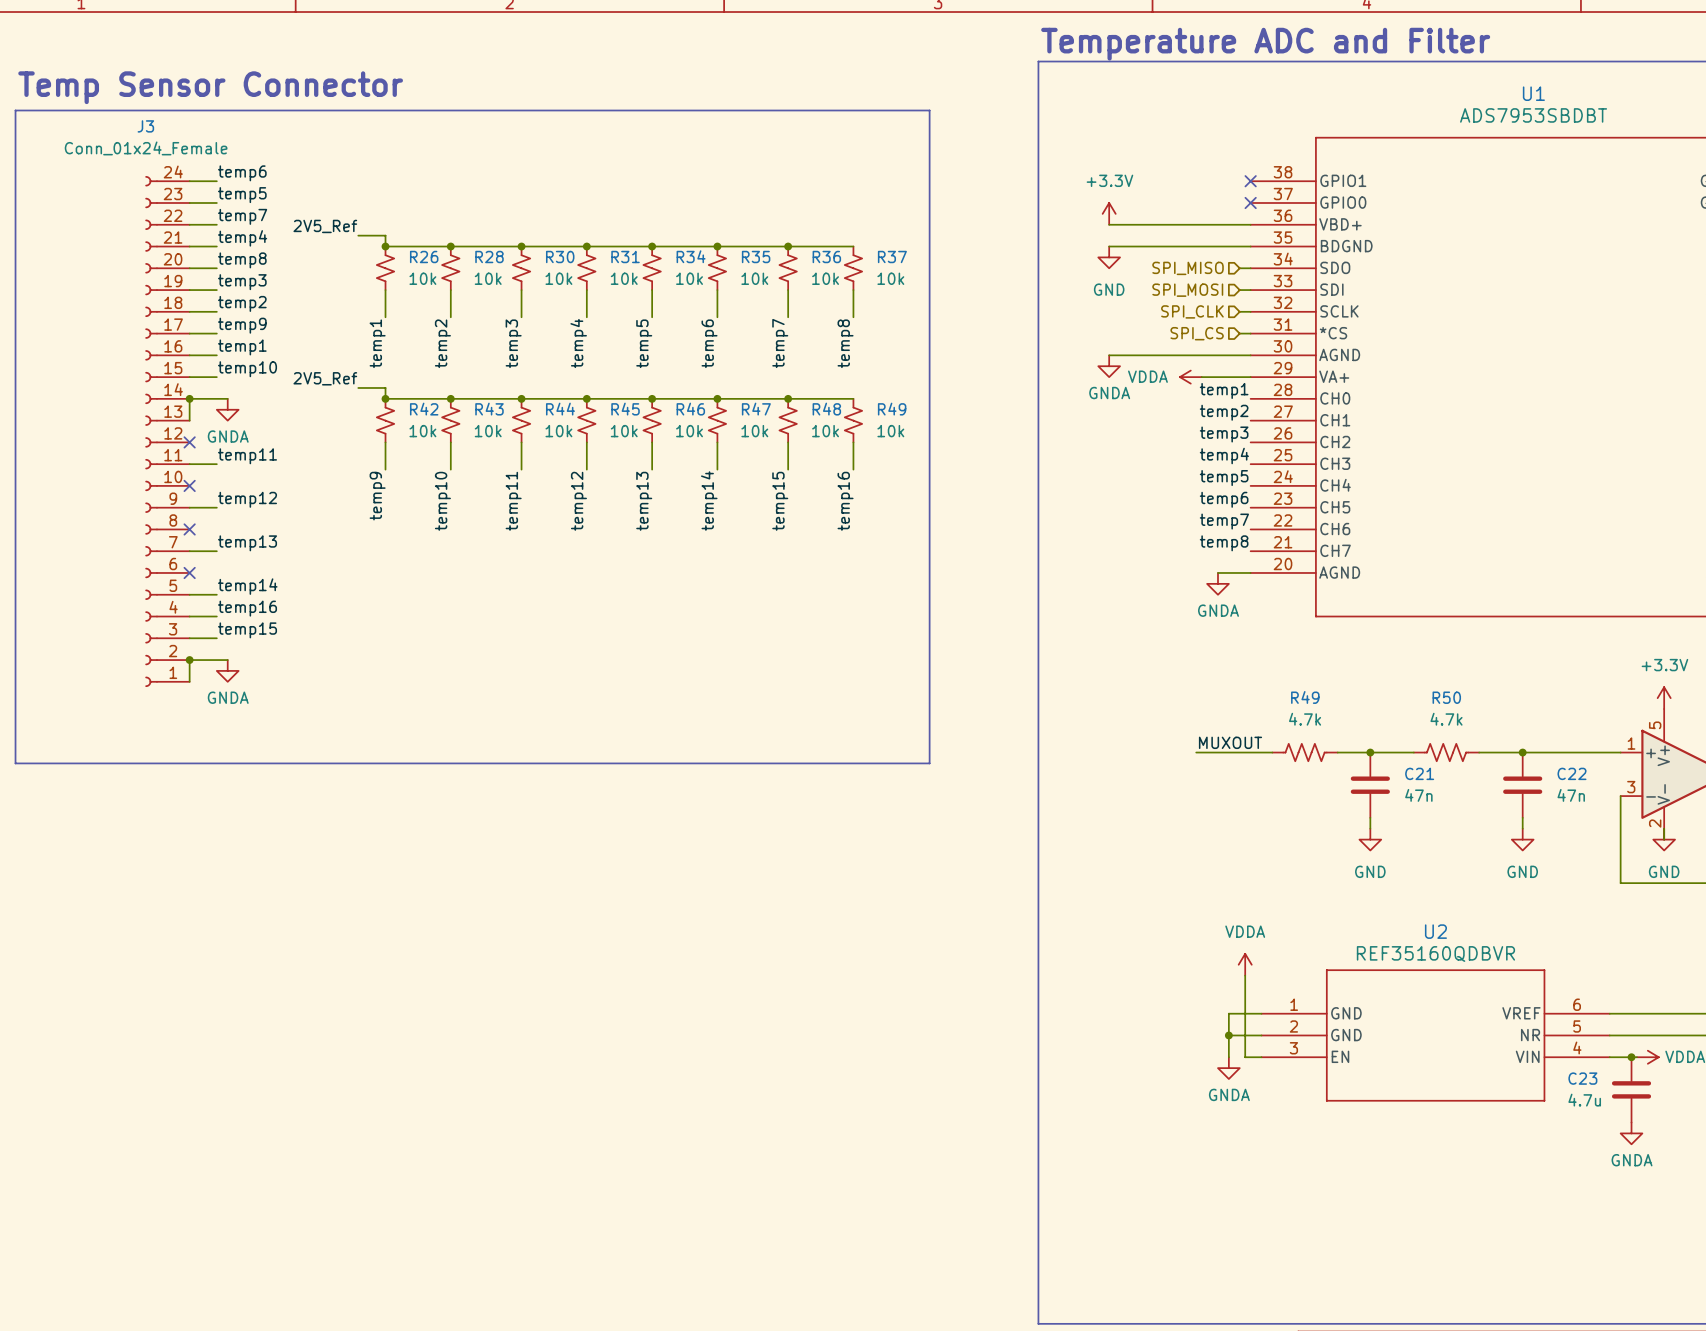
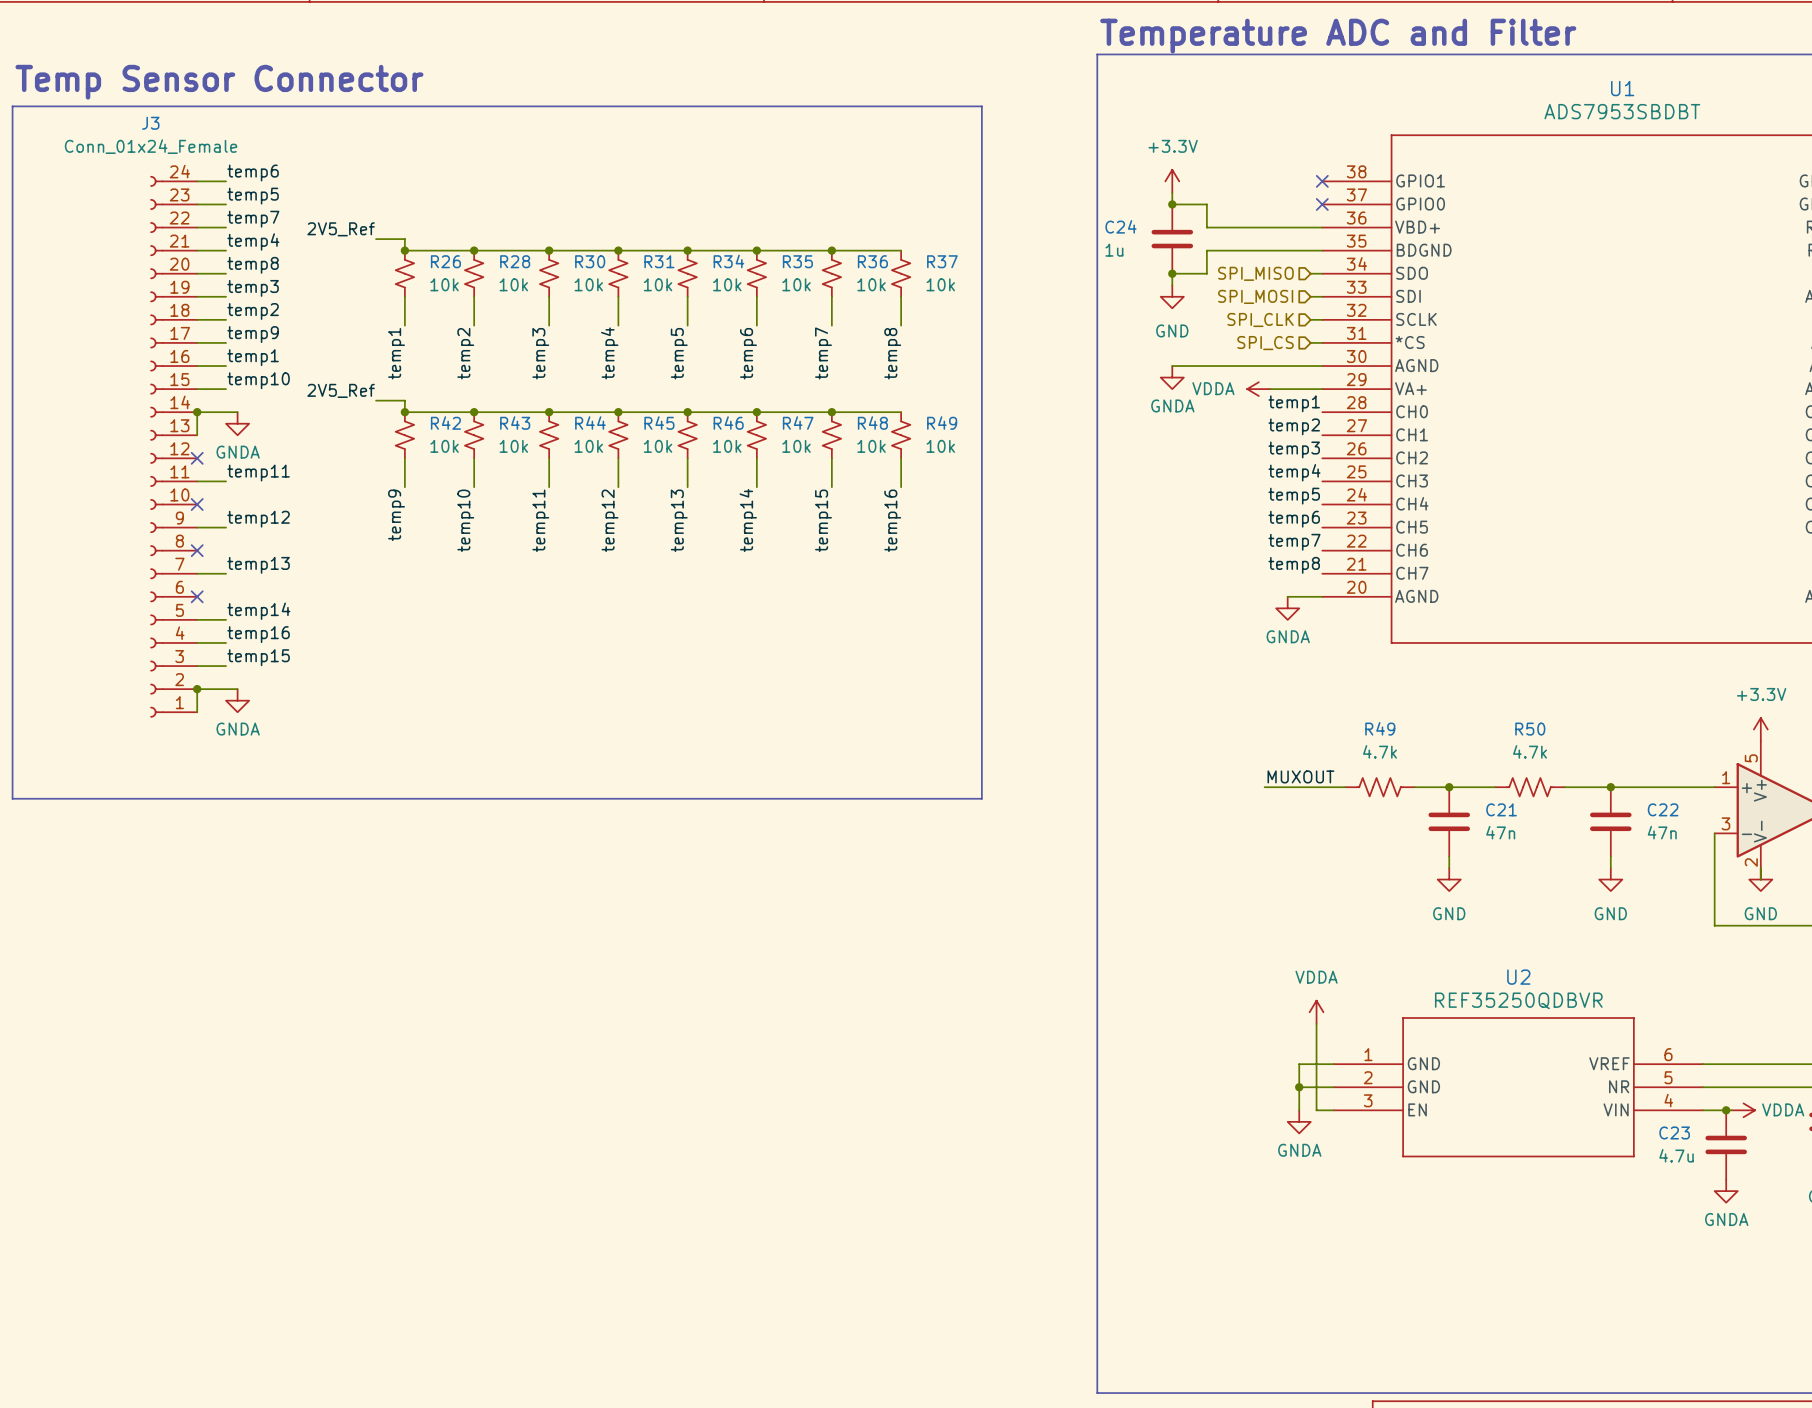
junction: none -> (1172, 204)
power symbol position: +3.3V (1109, 213) -> +3.3V (1172, 181)
wire: (1109, 224) (1141, 224) -> (1172, 192) (1172, 204) (1206, 204) (1206, 227)
C24: none -> 1u (1172, 239)
wire: (1109, 246) (1141, 246) -> (1172, 285) (1172, 273) (1206, 273) (1206, 250)
power symbol position: GND (1109, 257) -> GND (1172, 296)
junction: none -> (1172, 273)
U2 value: REF35160QDBVR (1435, 953) -> REF35250QDBVR (1518, 1000)

